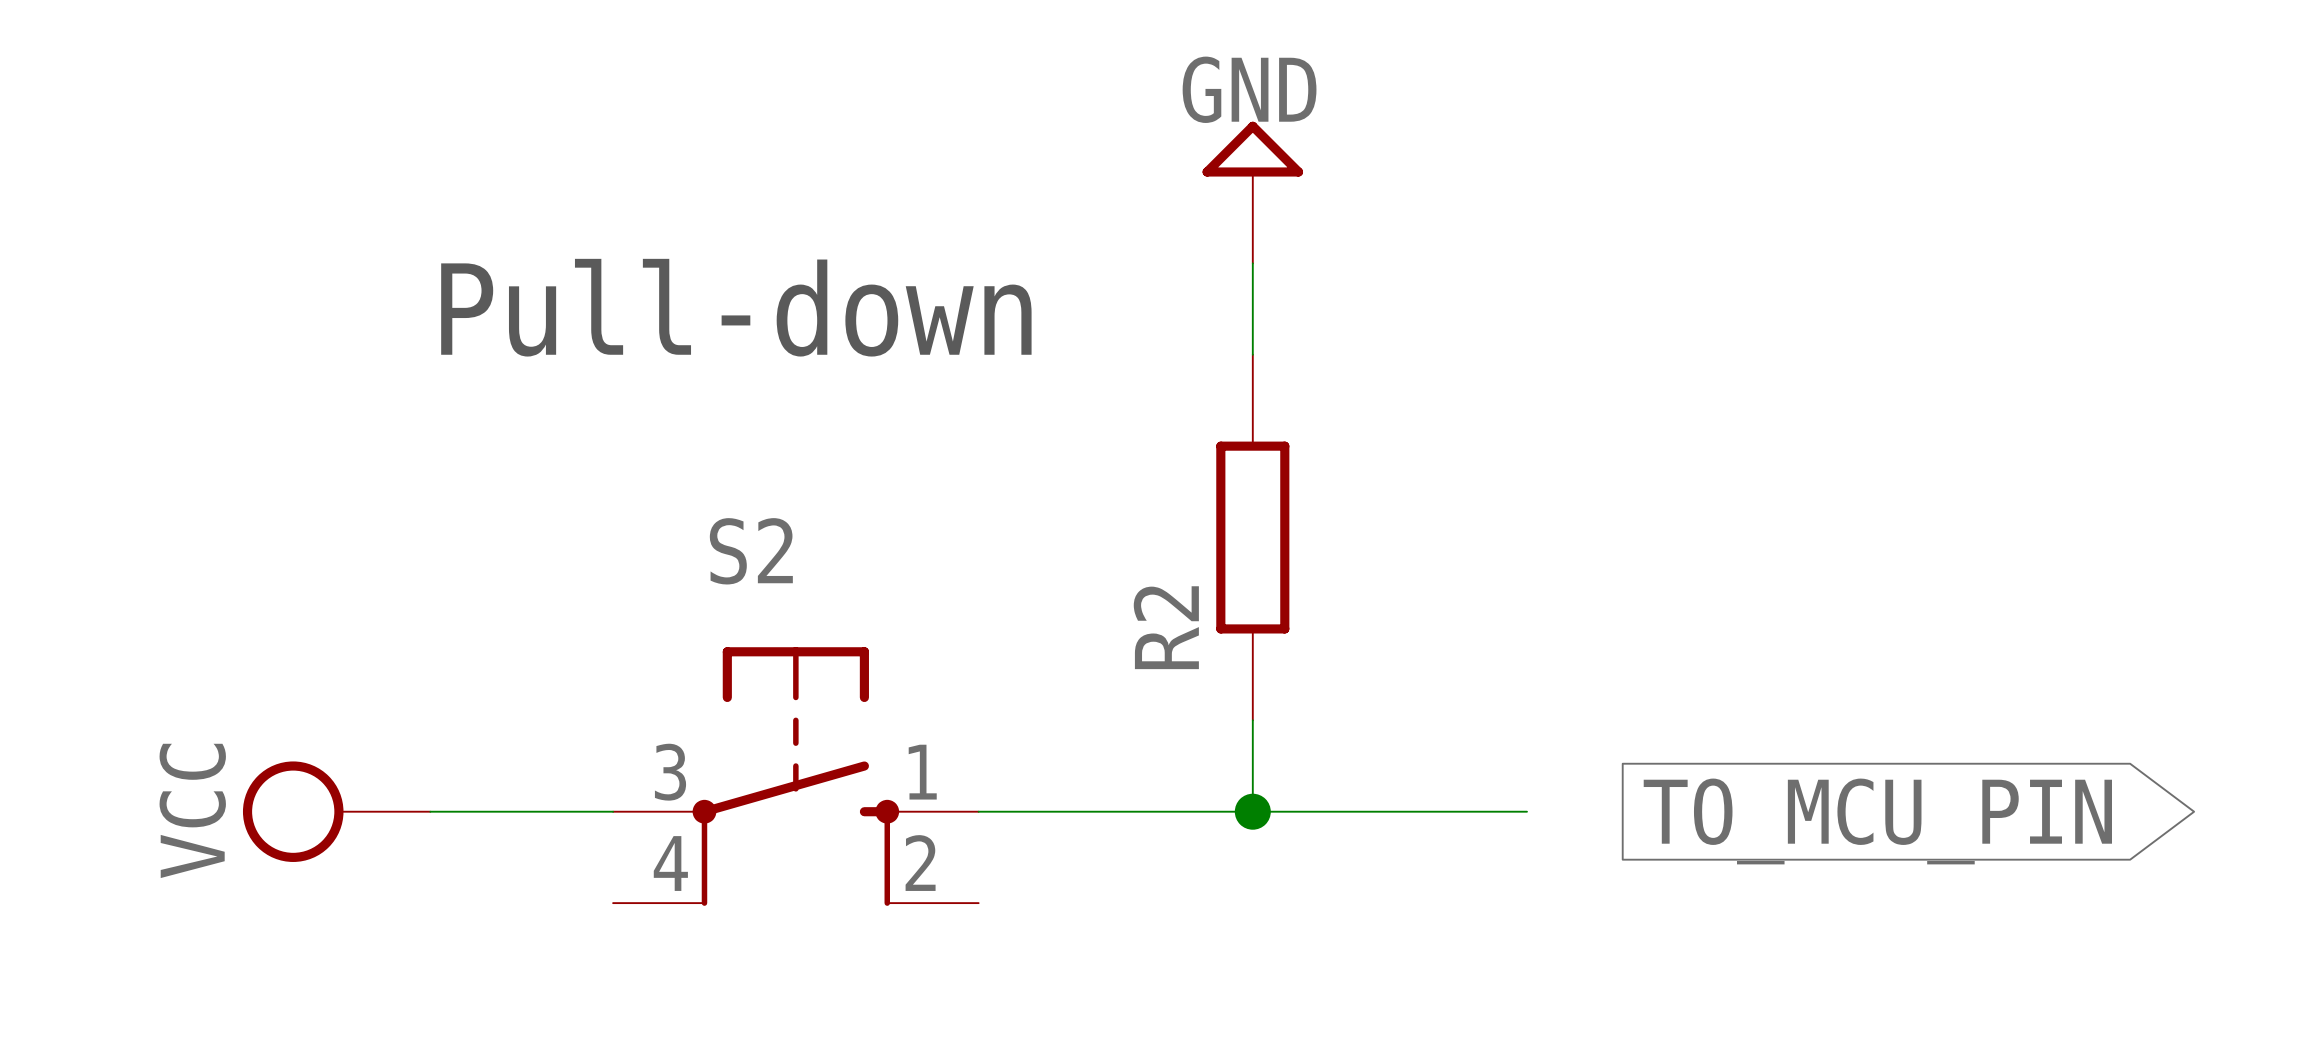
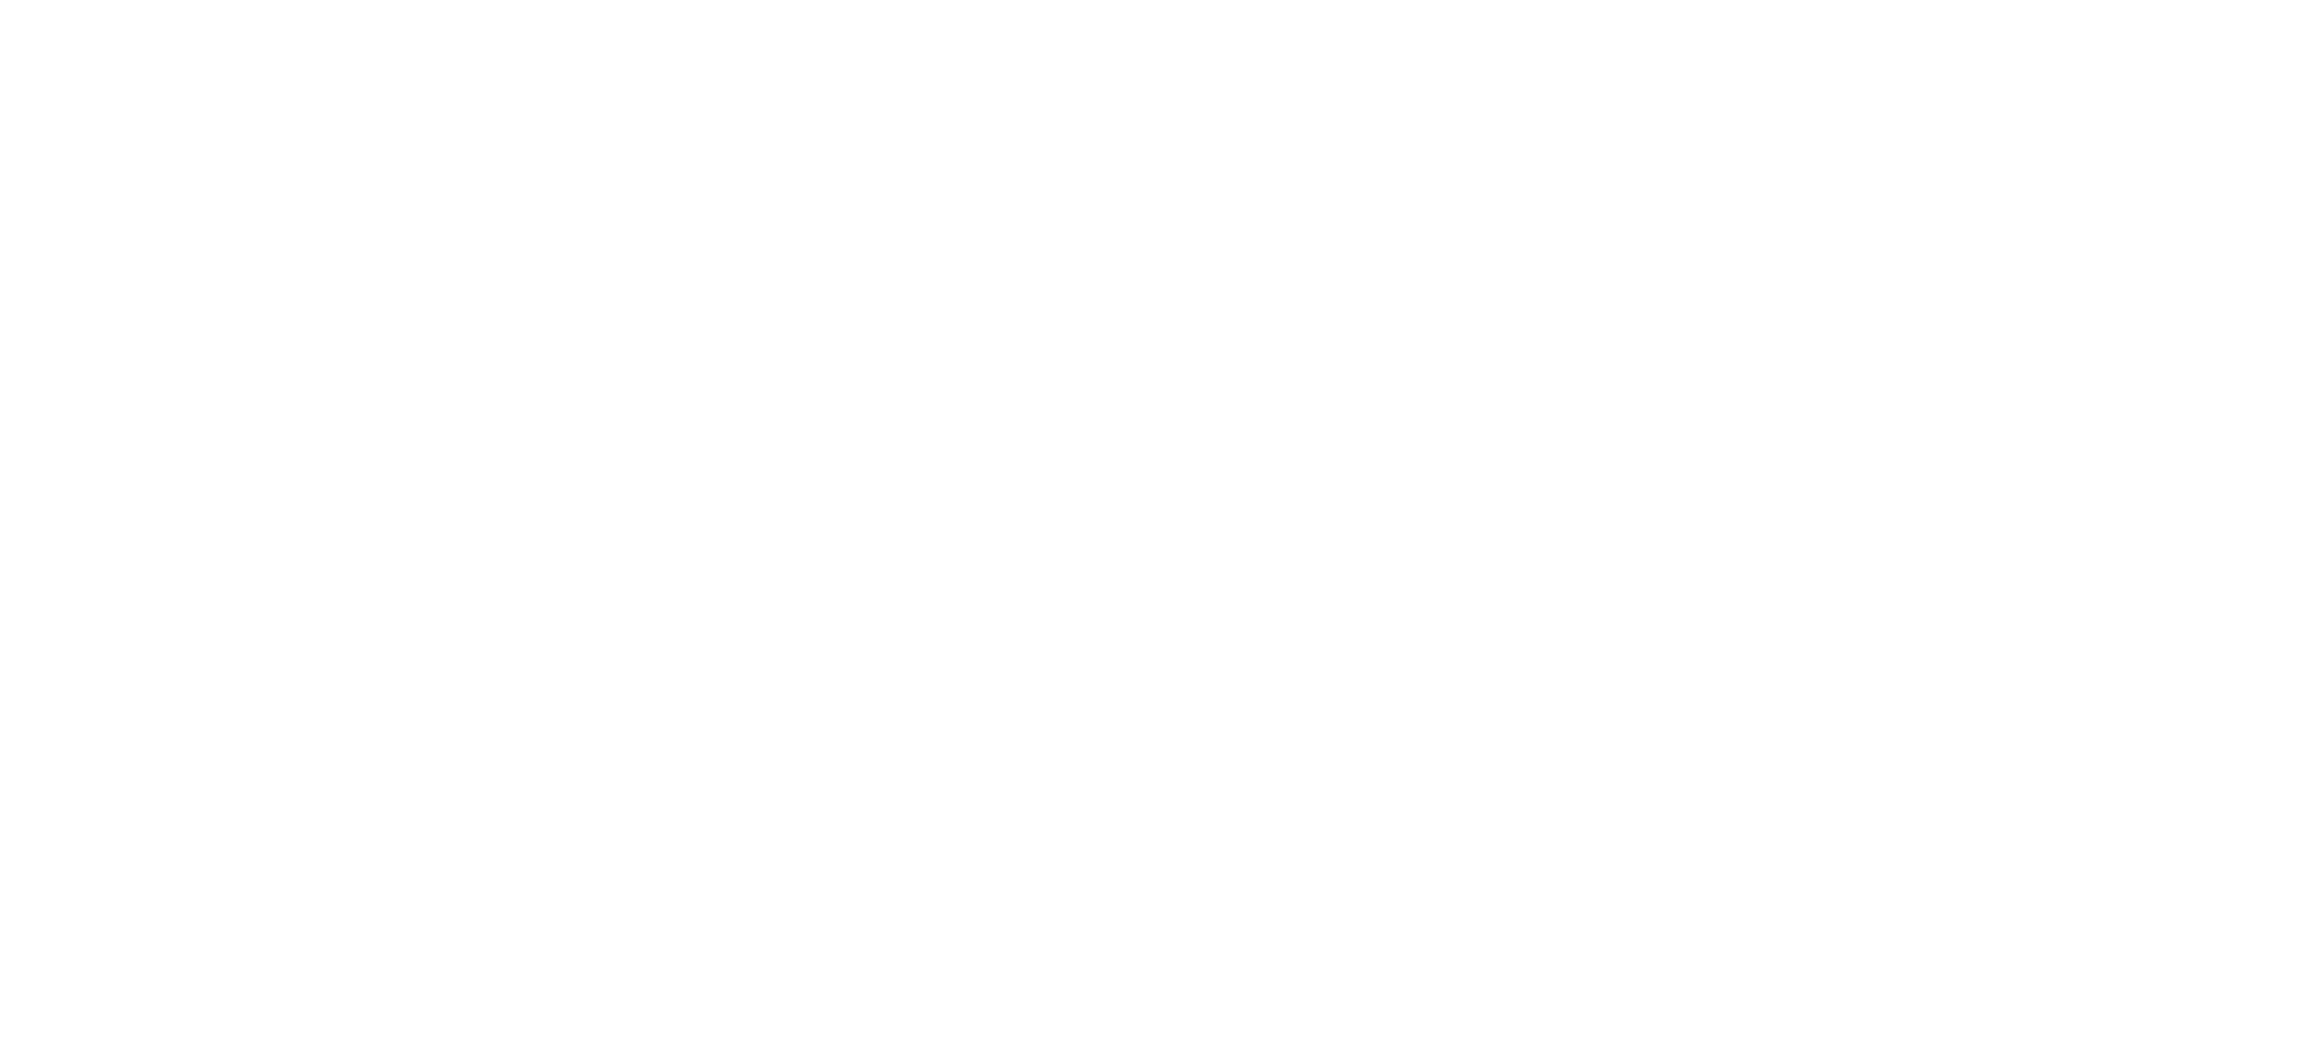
power symbol: GND (1252, 192) -> none
wire: (1252, 263) (1252, 354) -> none
text: Pull-down (736, 307) -> none
R2: (1252, 537) -> none
wire: (1252, 720) (1252, 811) -> none
S2: (795, 776) -> none
power symbol: VCC (336, 811) -> none
wire: (430, 811) (613, 811) -> none
wire: (978, 811) (1526, 811) -> none
junction: (1252, 811) -> none
global label: TO_MCU_PIN (1877, 821) -> none

